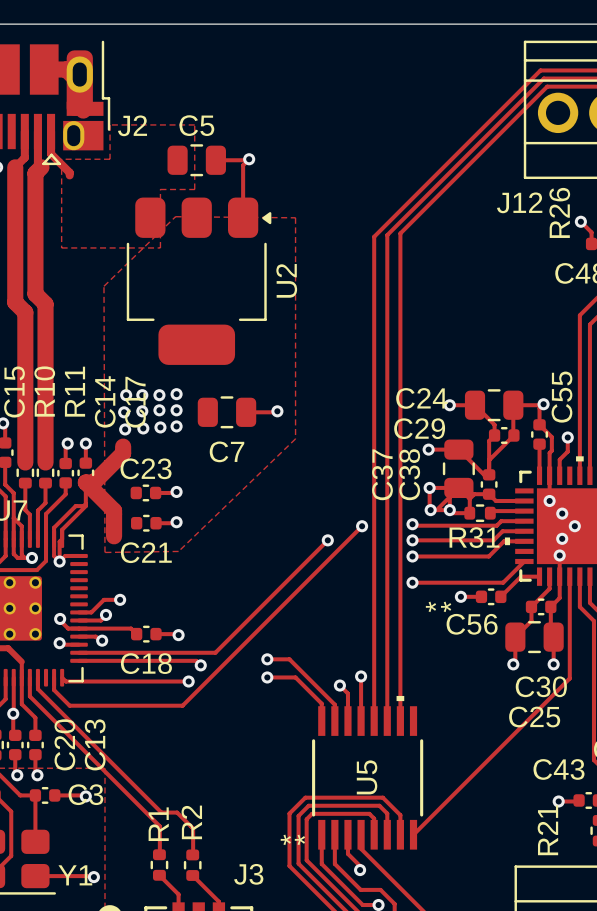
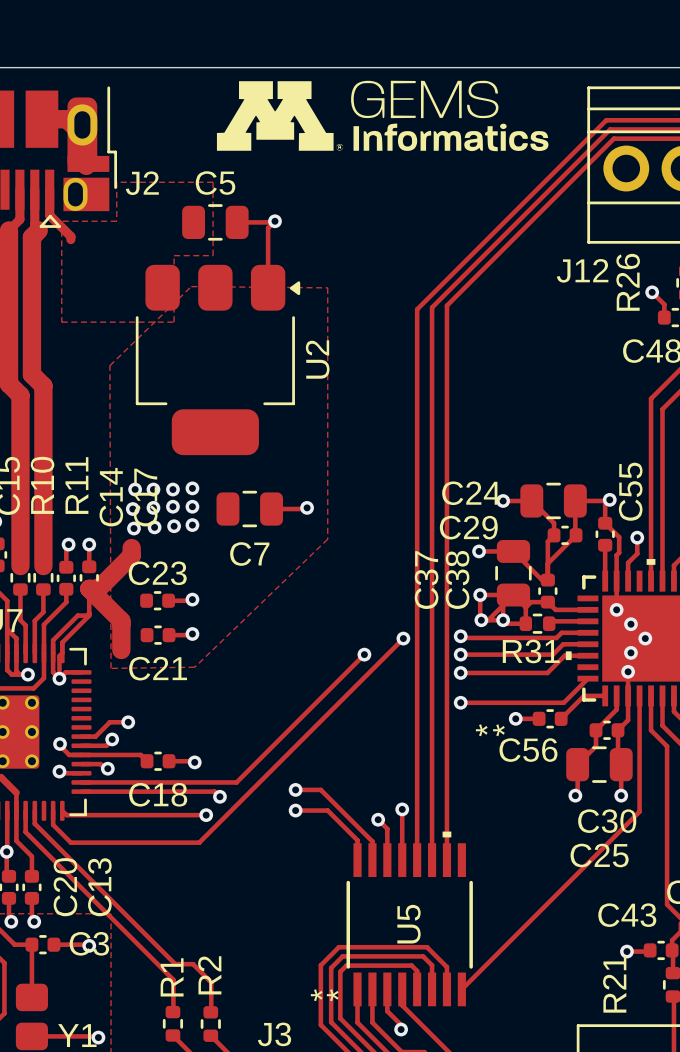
part: none -> (382, 115)

